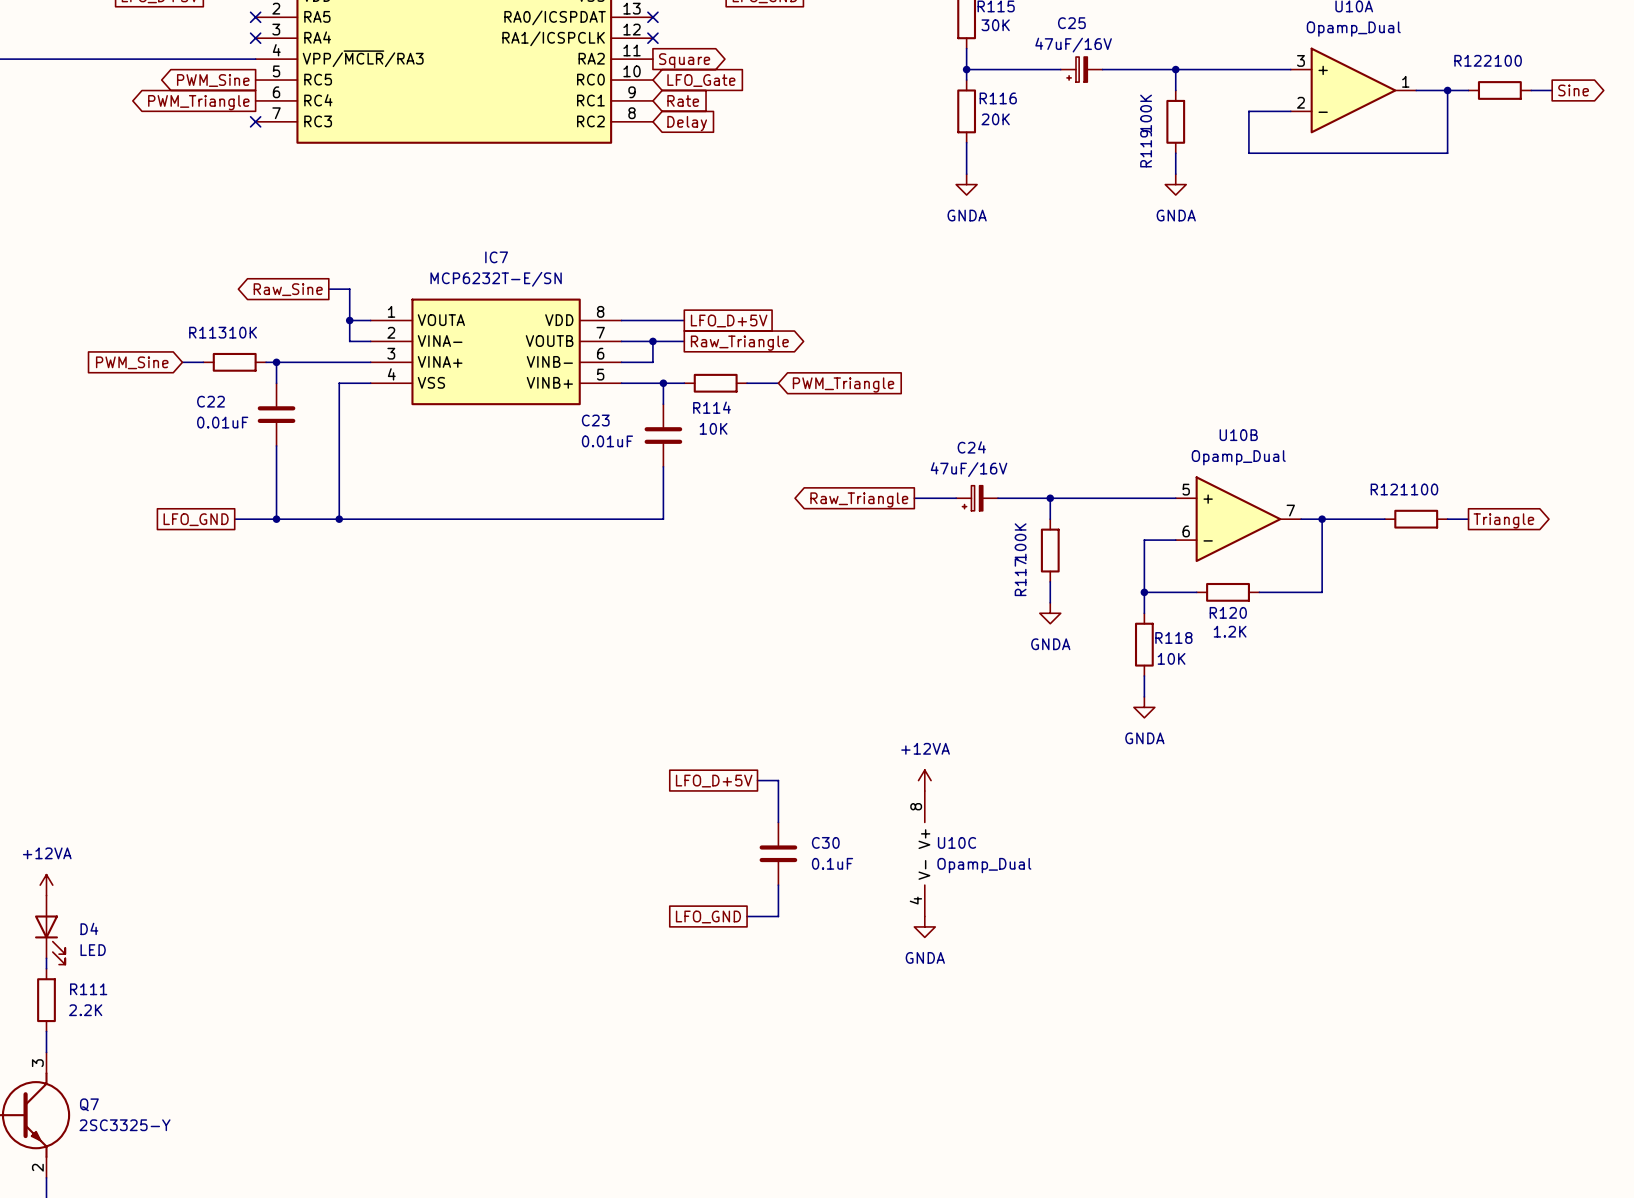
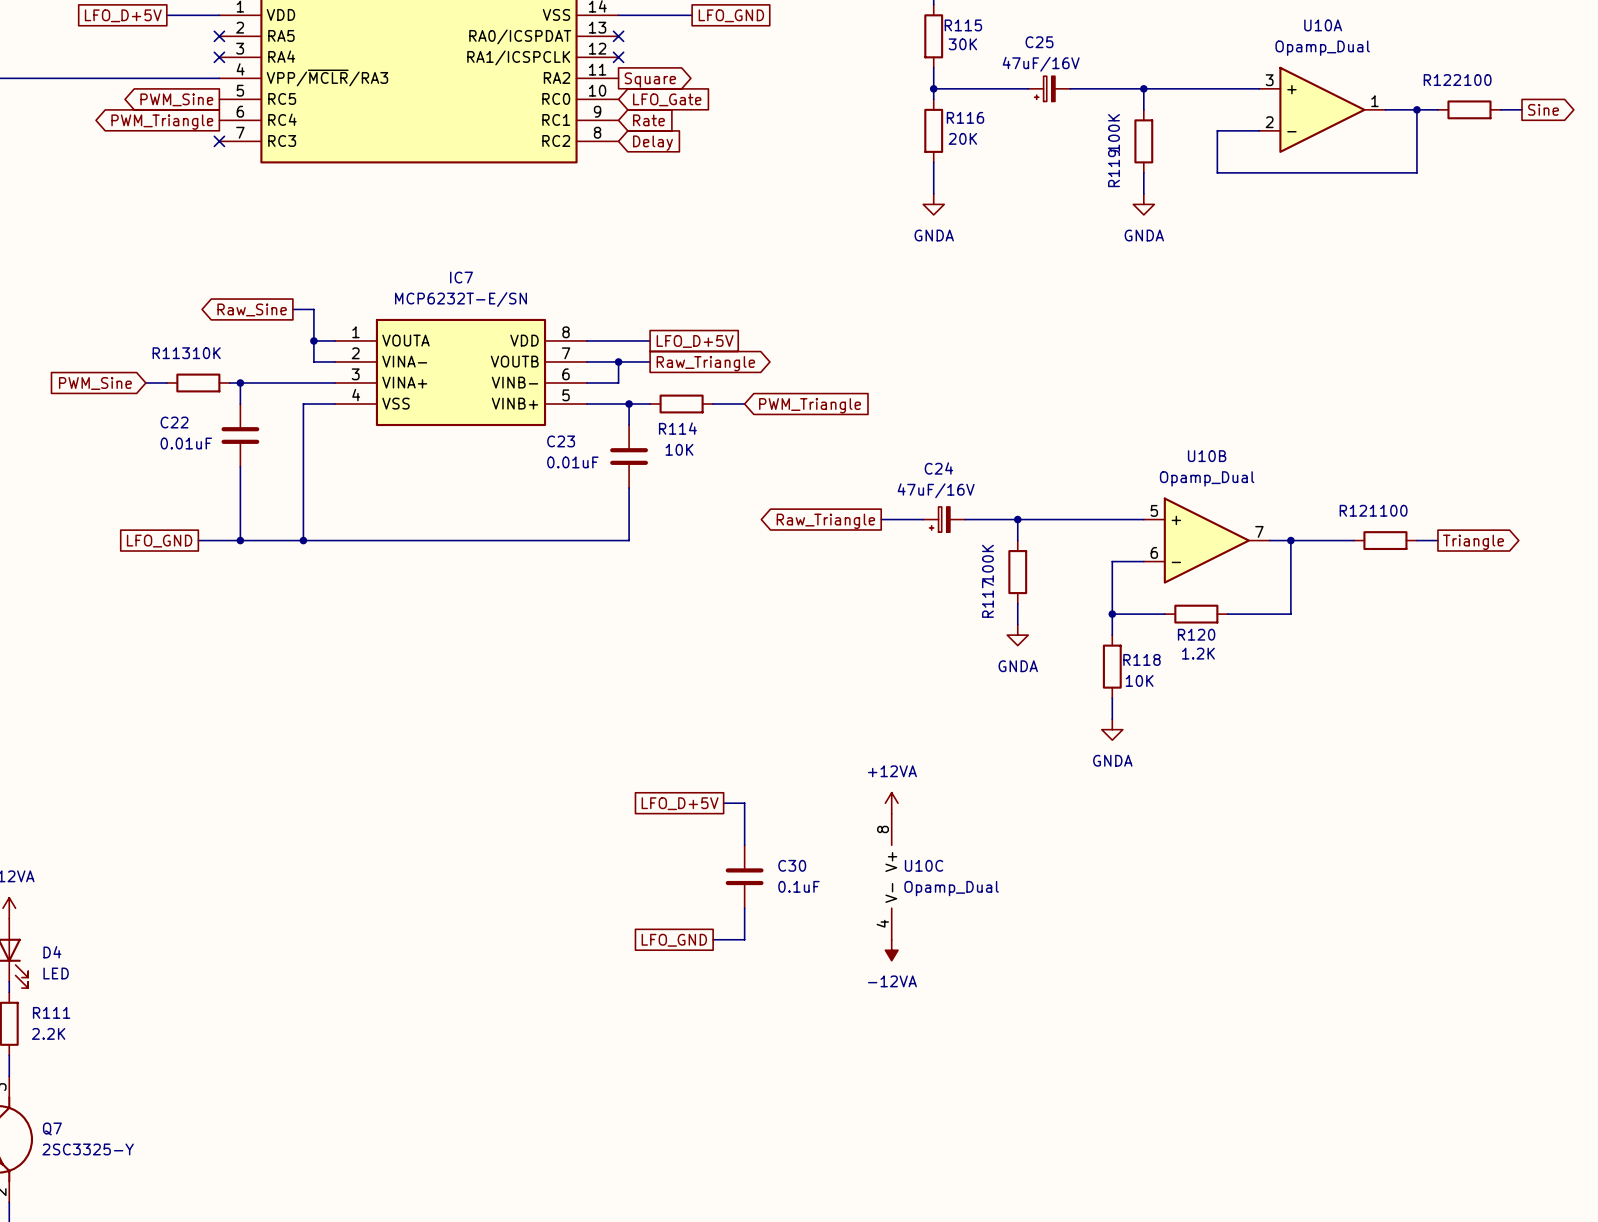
power symbol: GNDA (924, 926) -> -12VA (891, 950)

